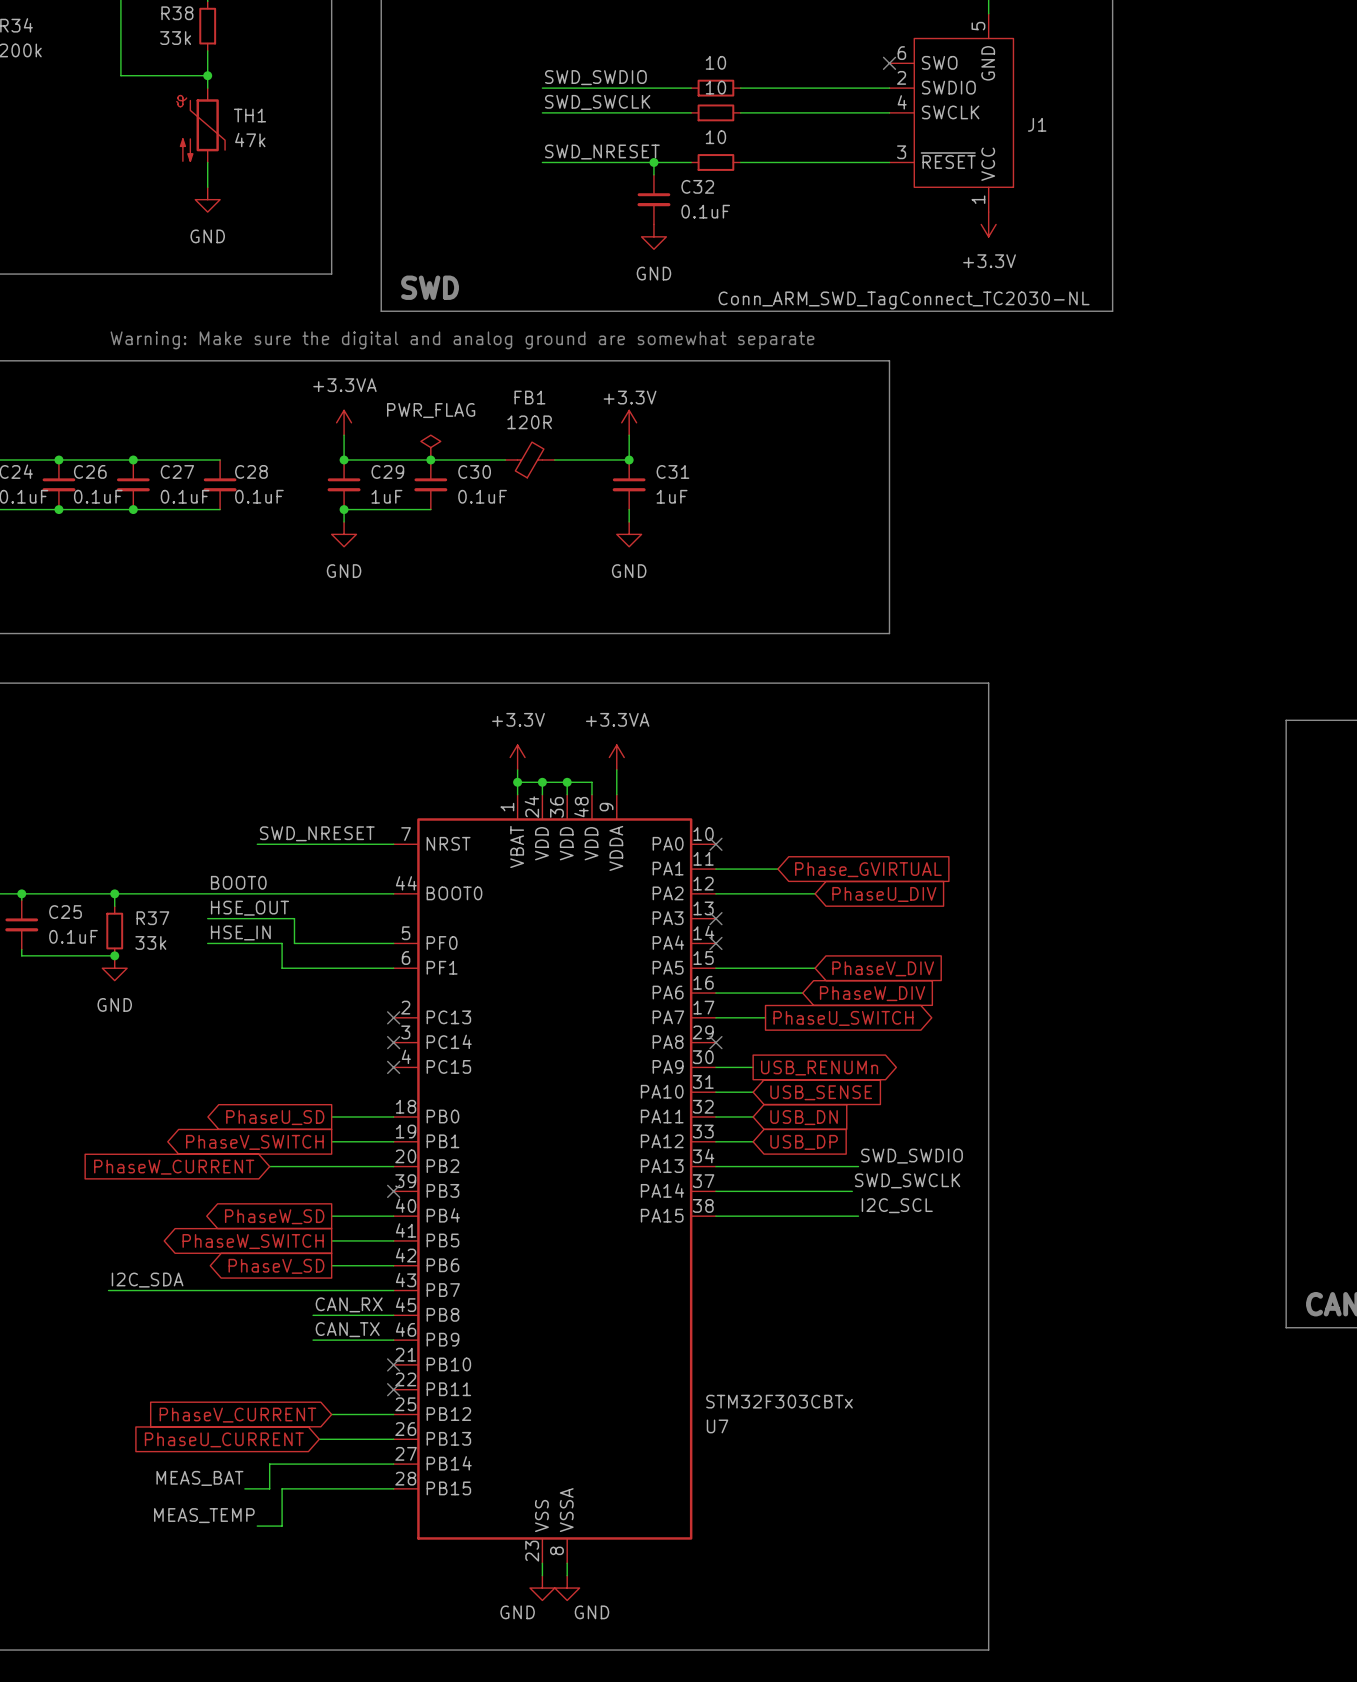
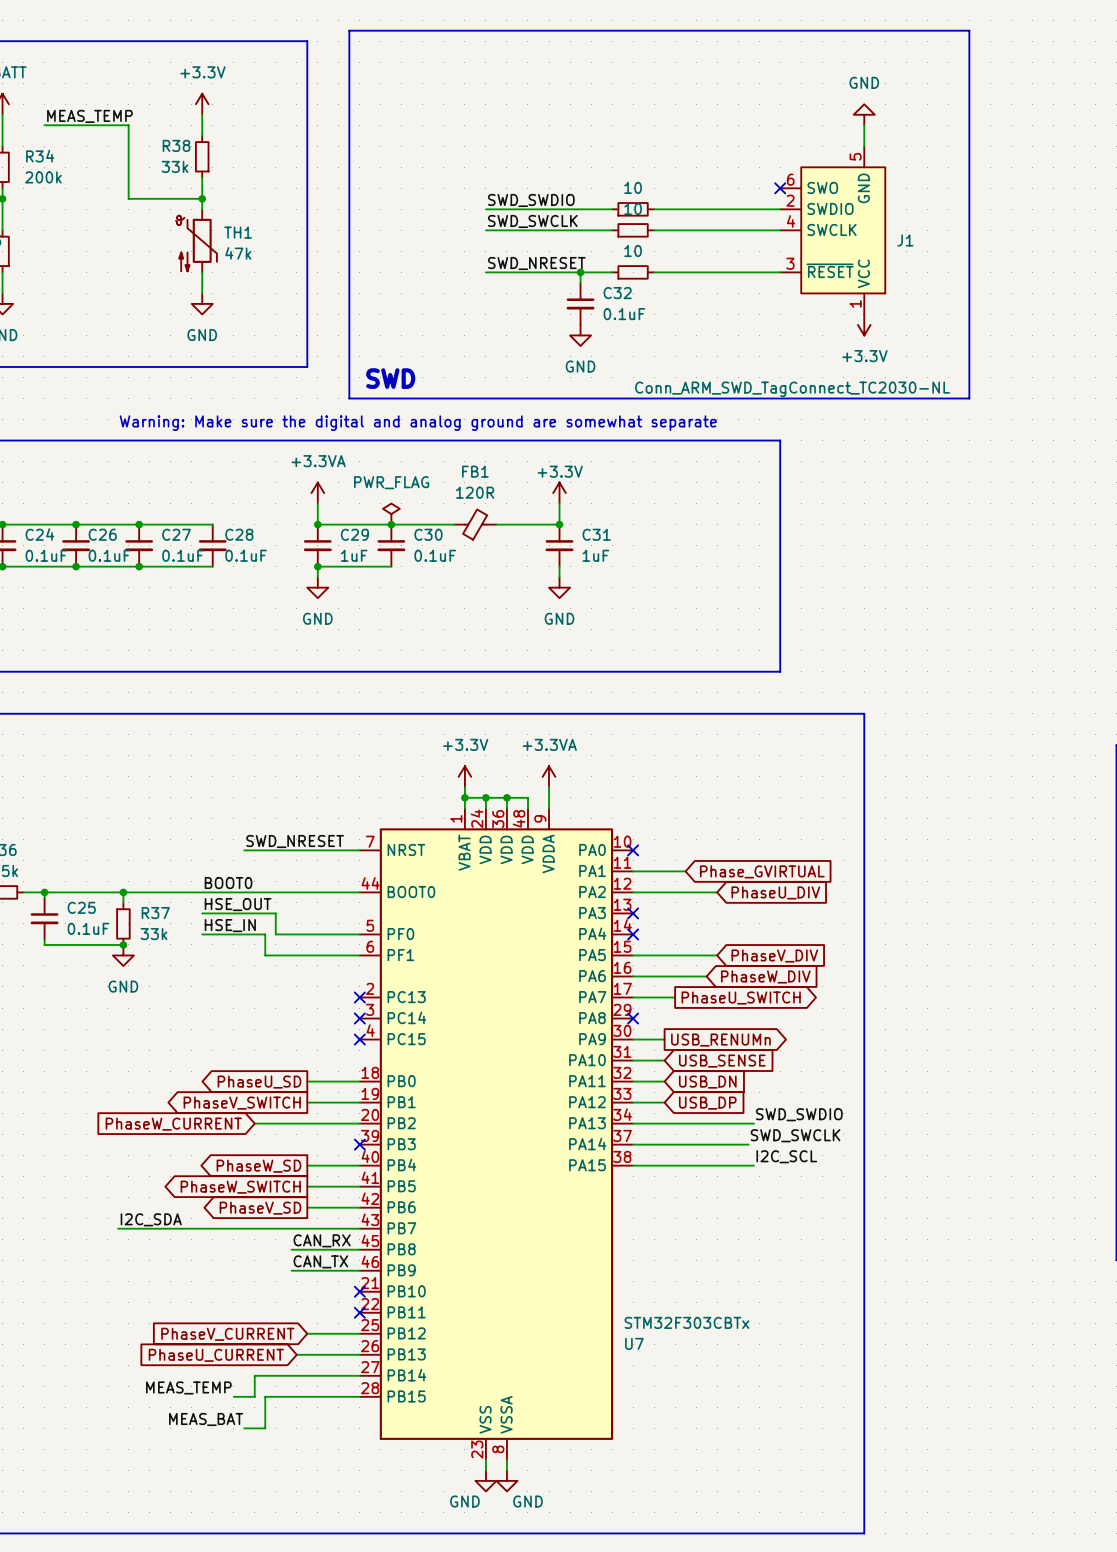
label: MEAS_BAT (199, 1478) -> MEAS_TEMP (188, 1387)
label: MEAS_TEMP (204, 1515) -> MEAS_BAT (206, 1419)

